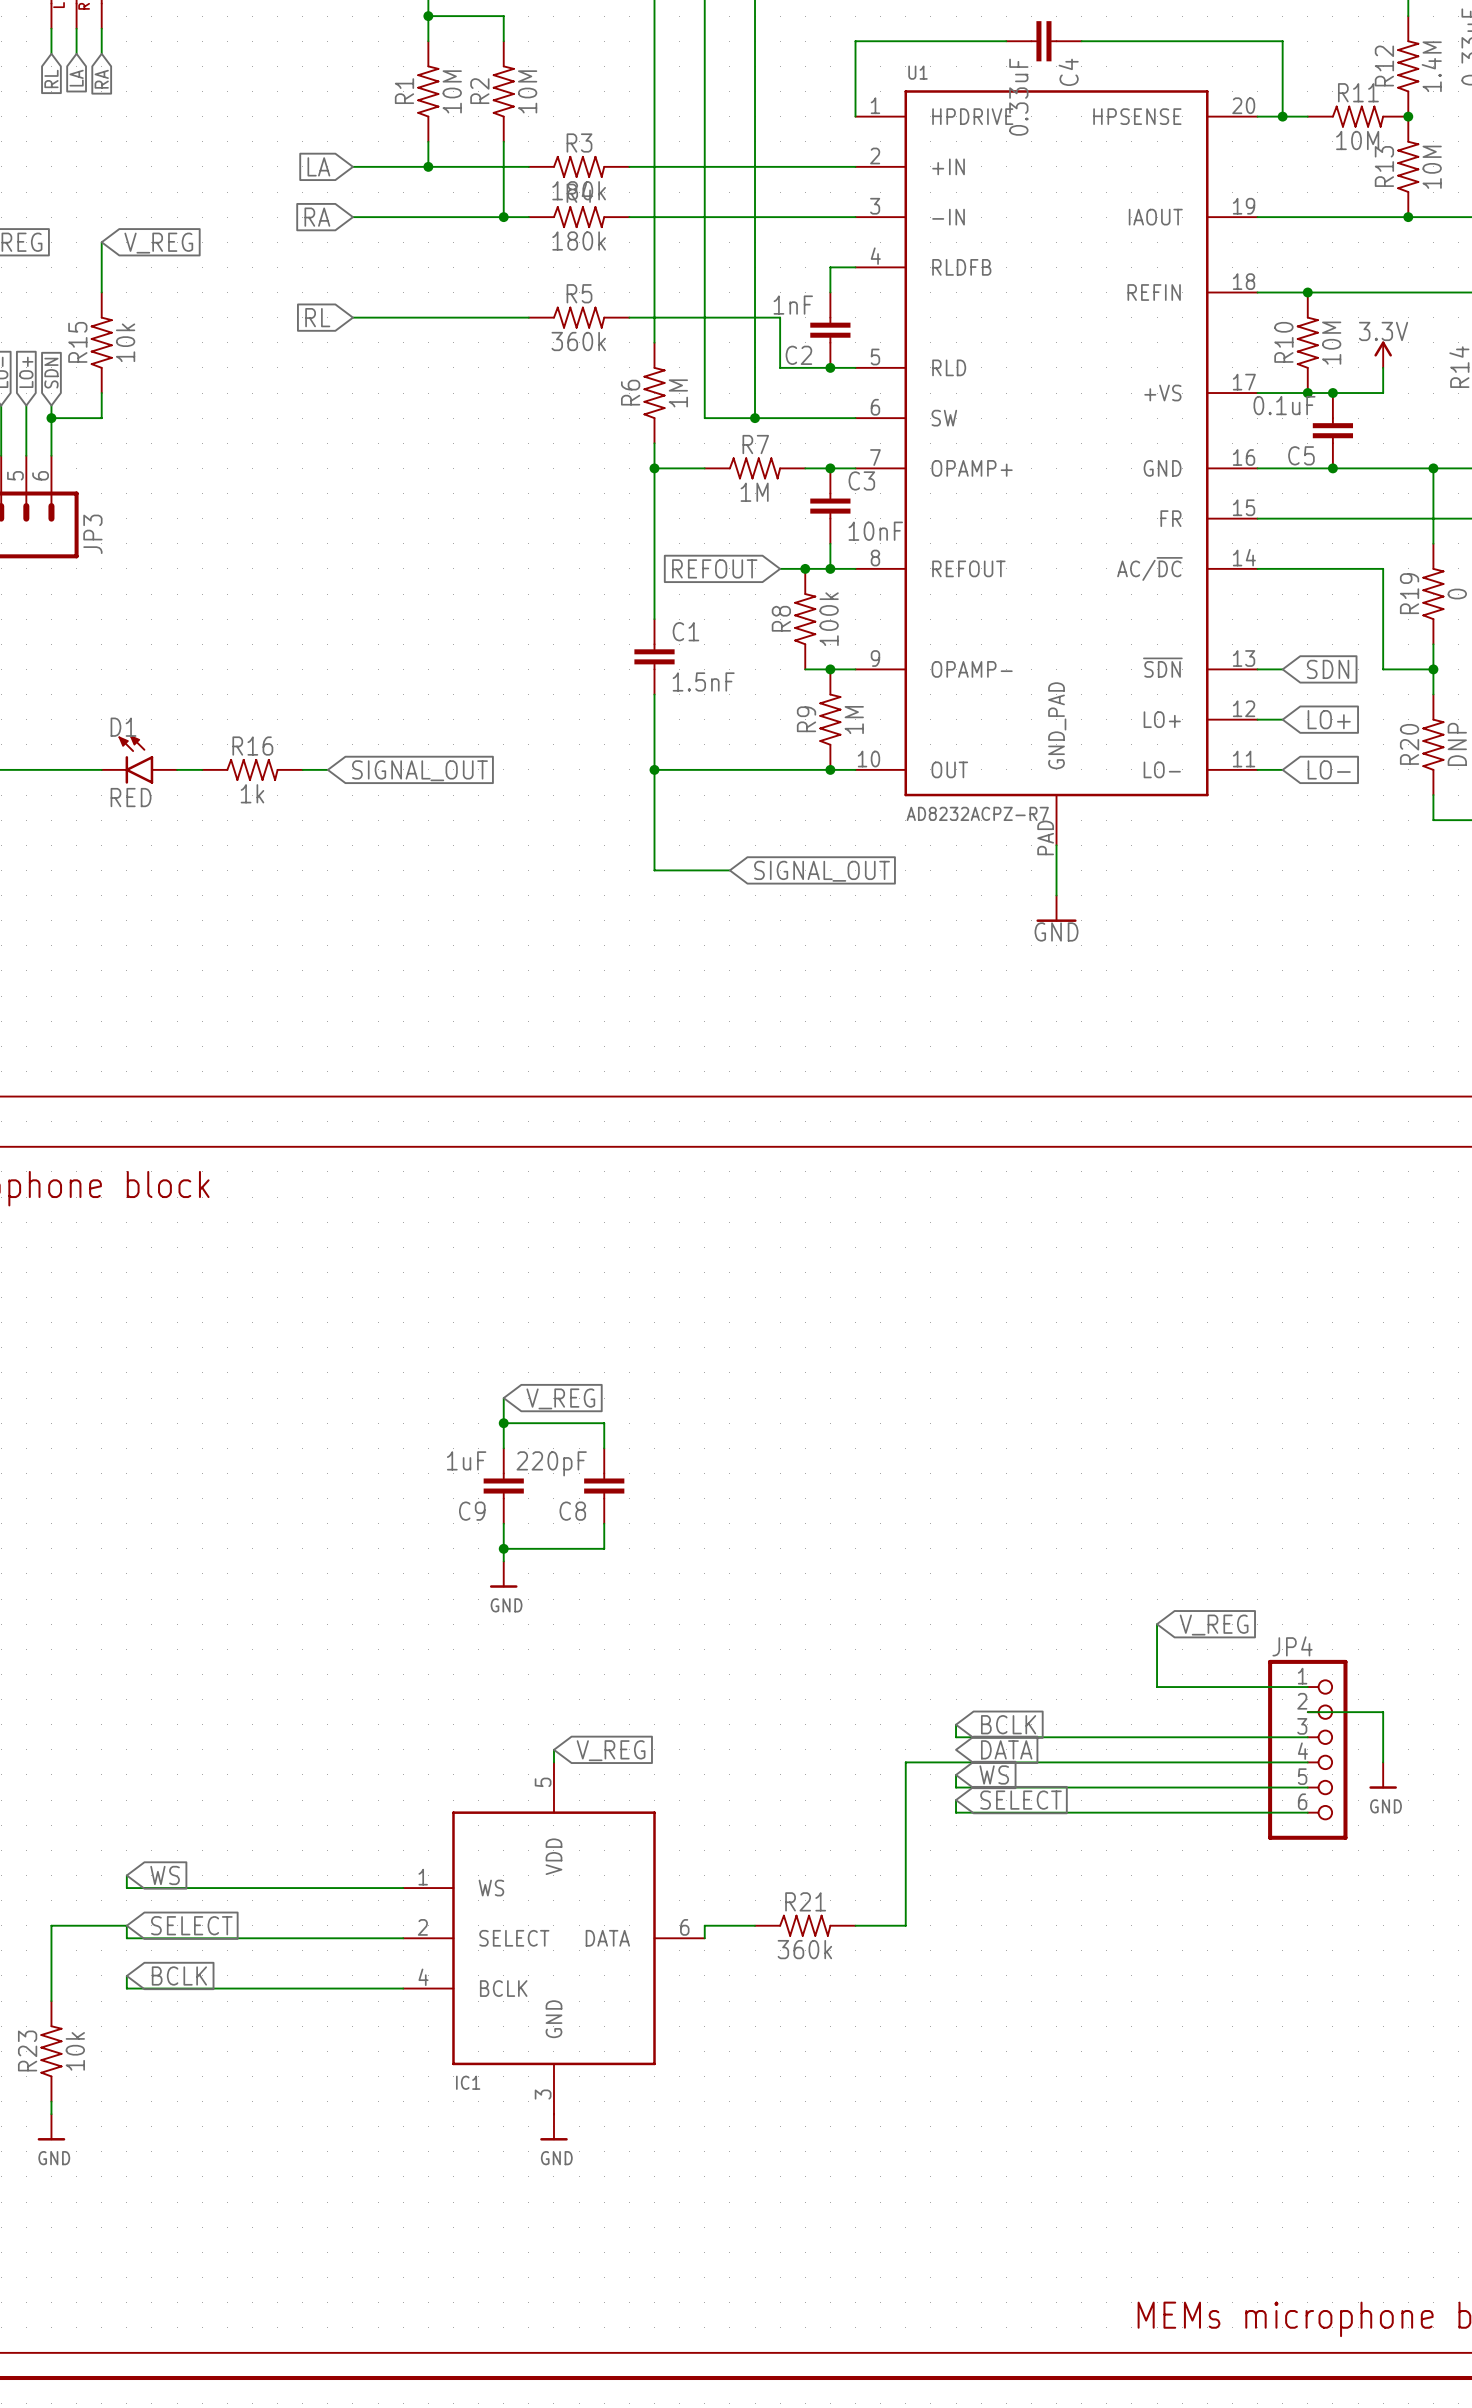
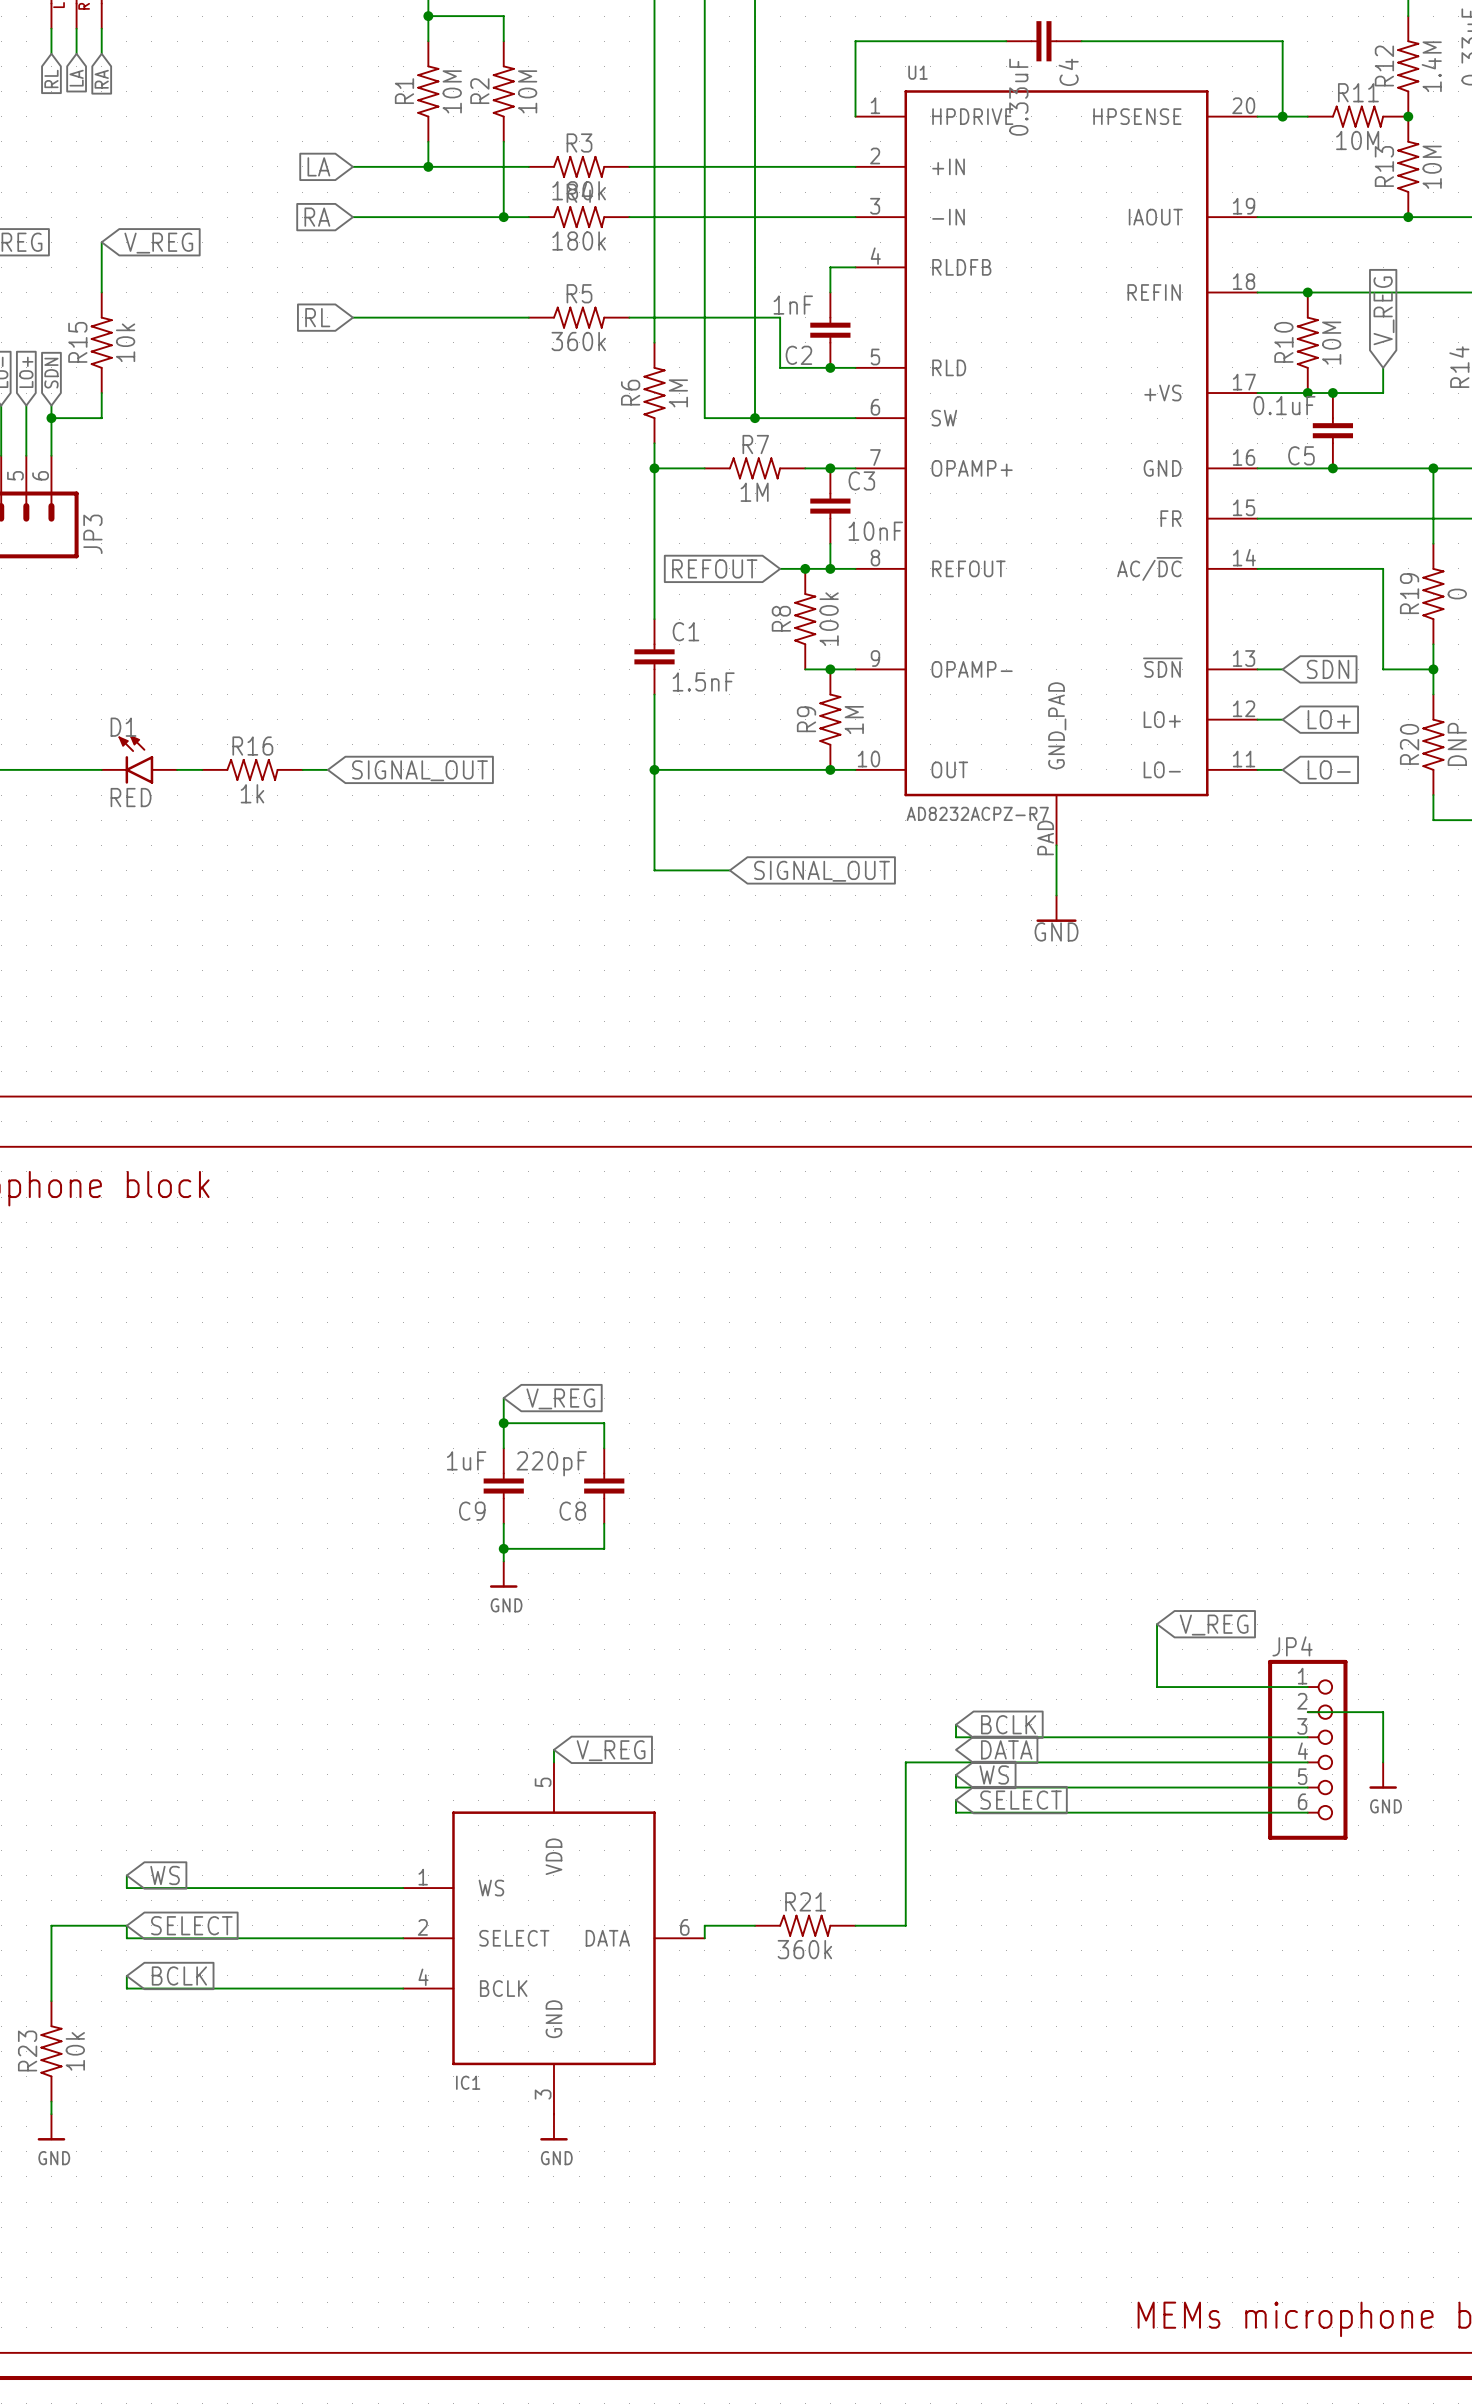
global label: none -> V_REG (1384, 310)
power symbol: 3.3V (1383, 354) -> none

